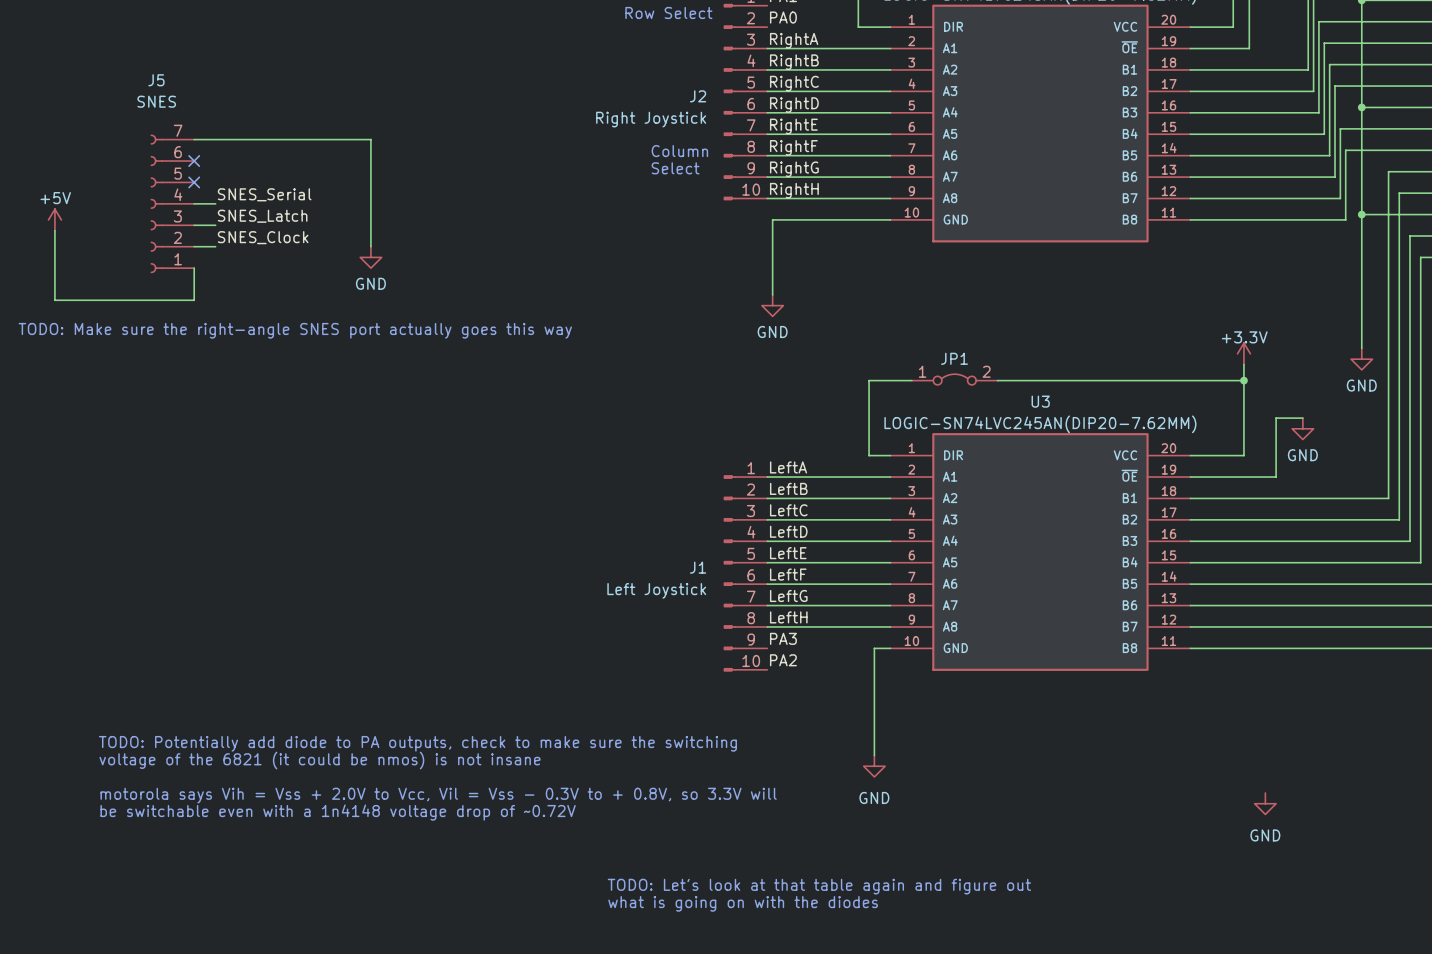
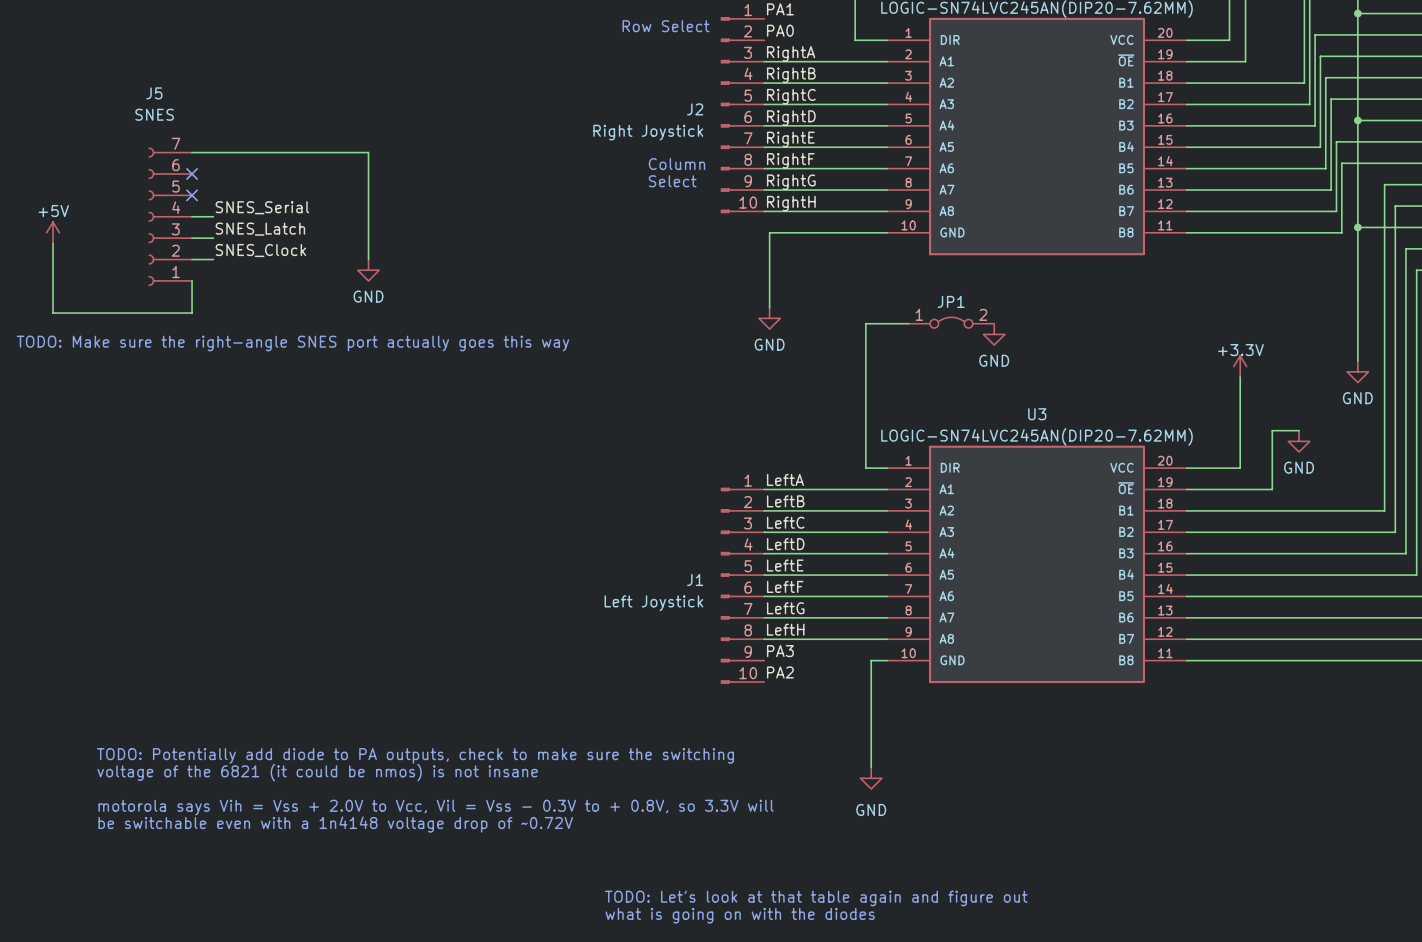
power symbol: none -> GND (994, 334)
JP1 position: (954, 379) -> (951, 322)
wire: (869, 380) (911, 380) -> (865, 393) (865, 323) (908, 323)
wire: (997, 380) (1243, 380) -> none
junction: (1243, 380) -> none
power symbol: GND (1265, 803) -> none

